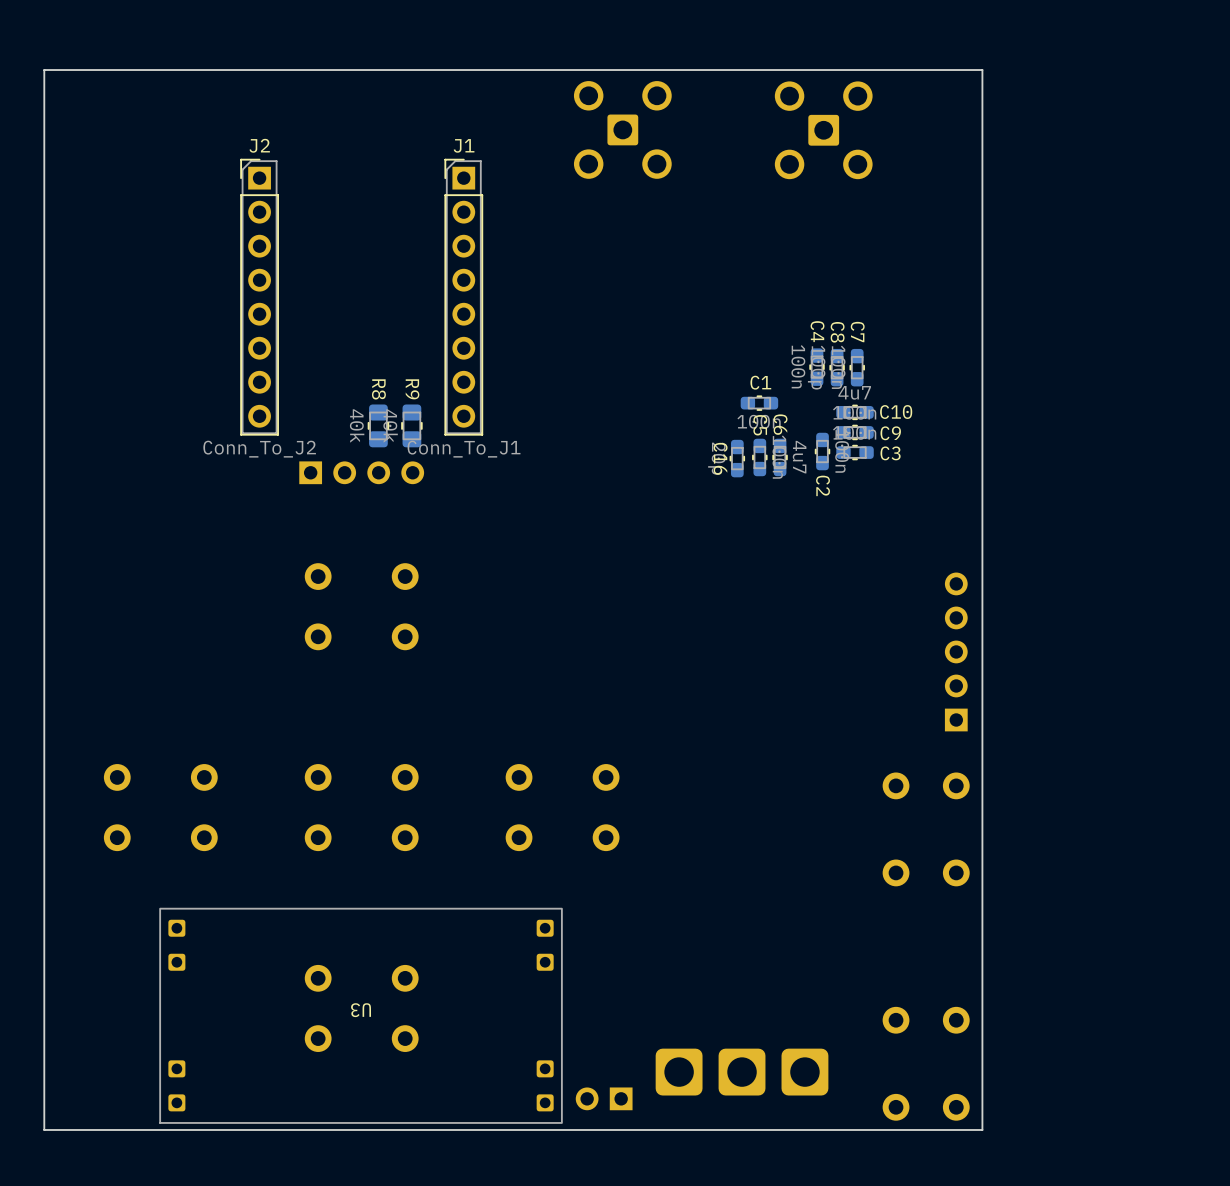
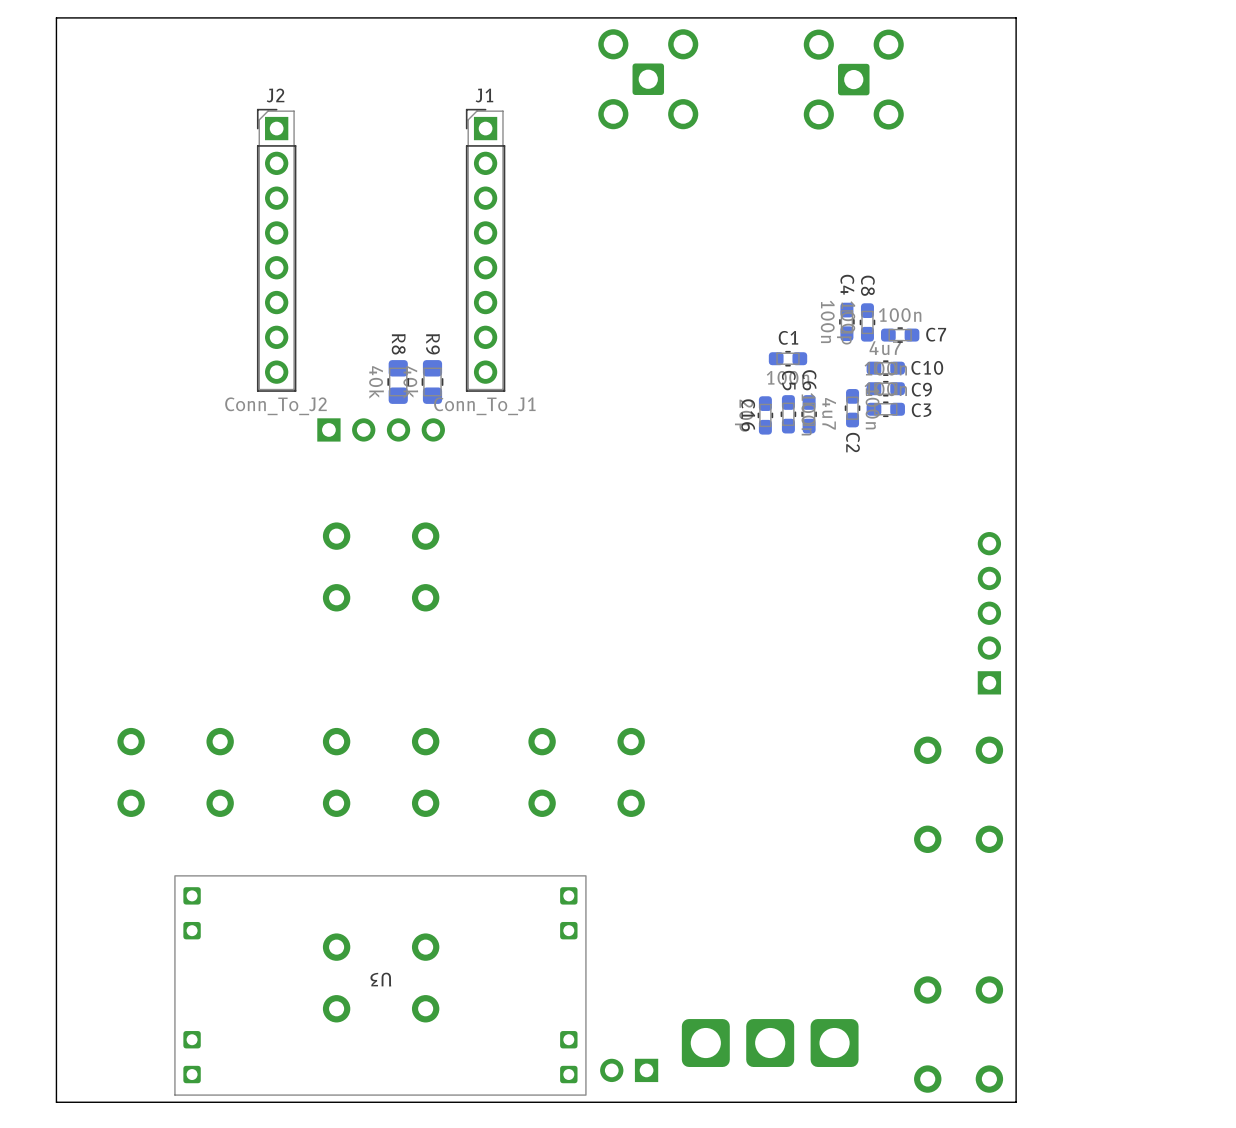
C7 rotation: 0° (857, 367) -> 90° clockwise (900, 335)

